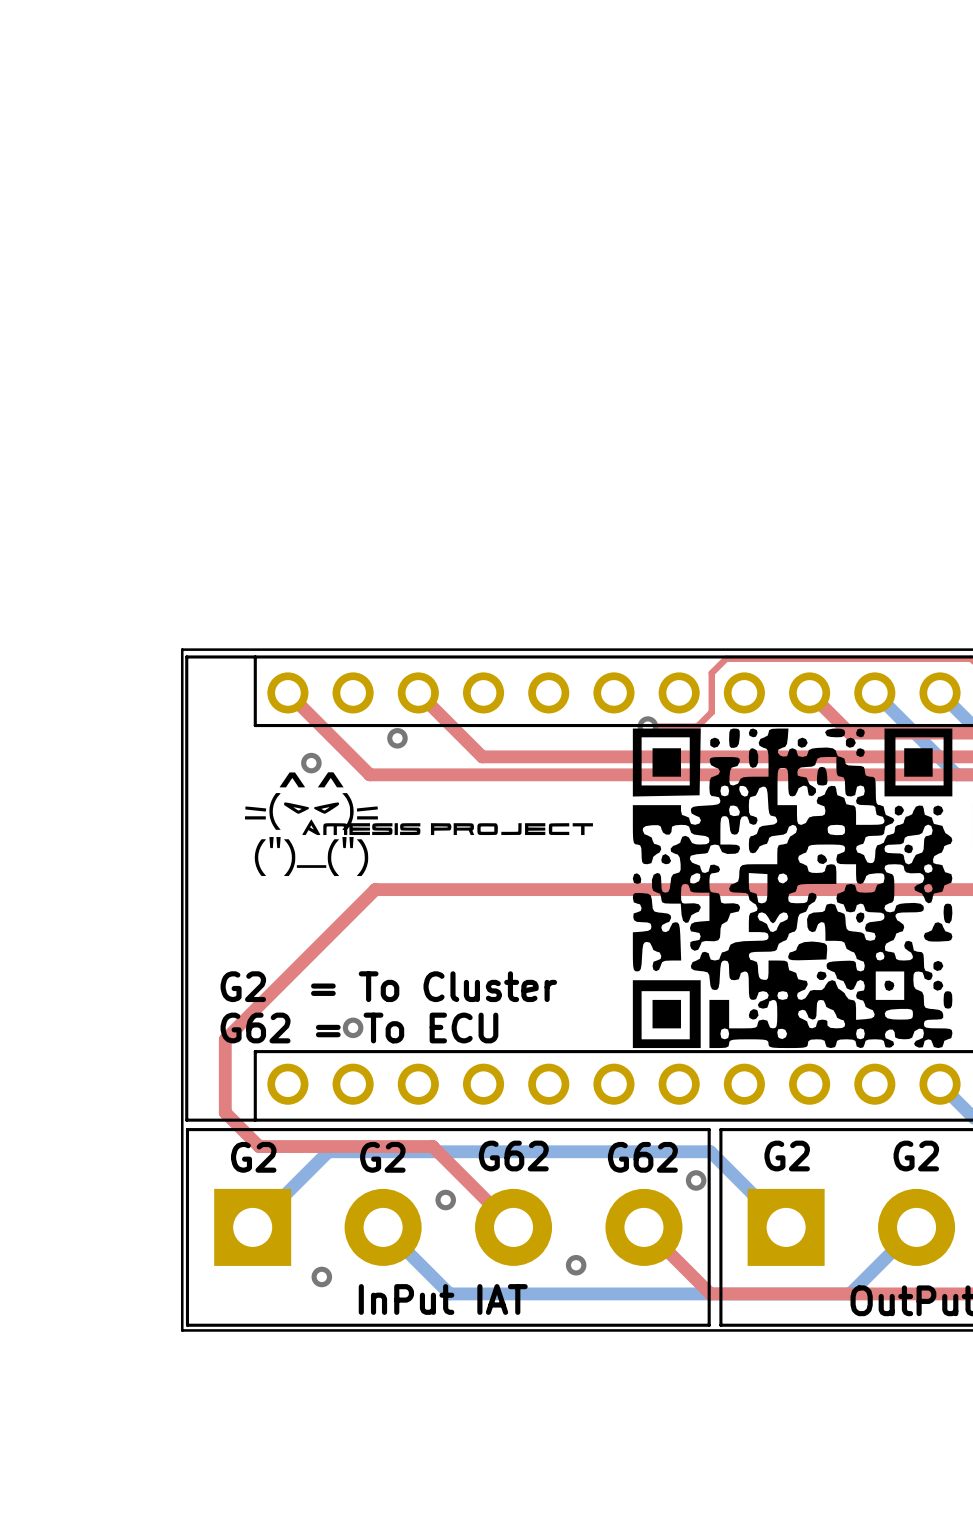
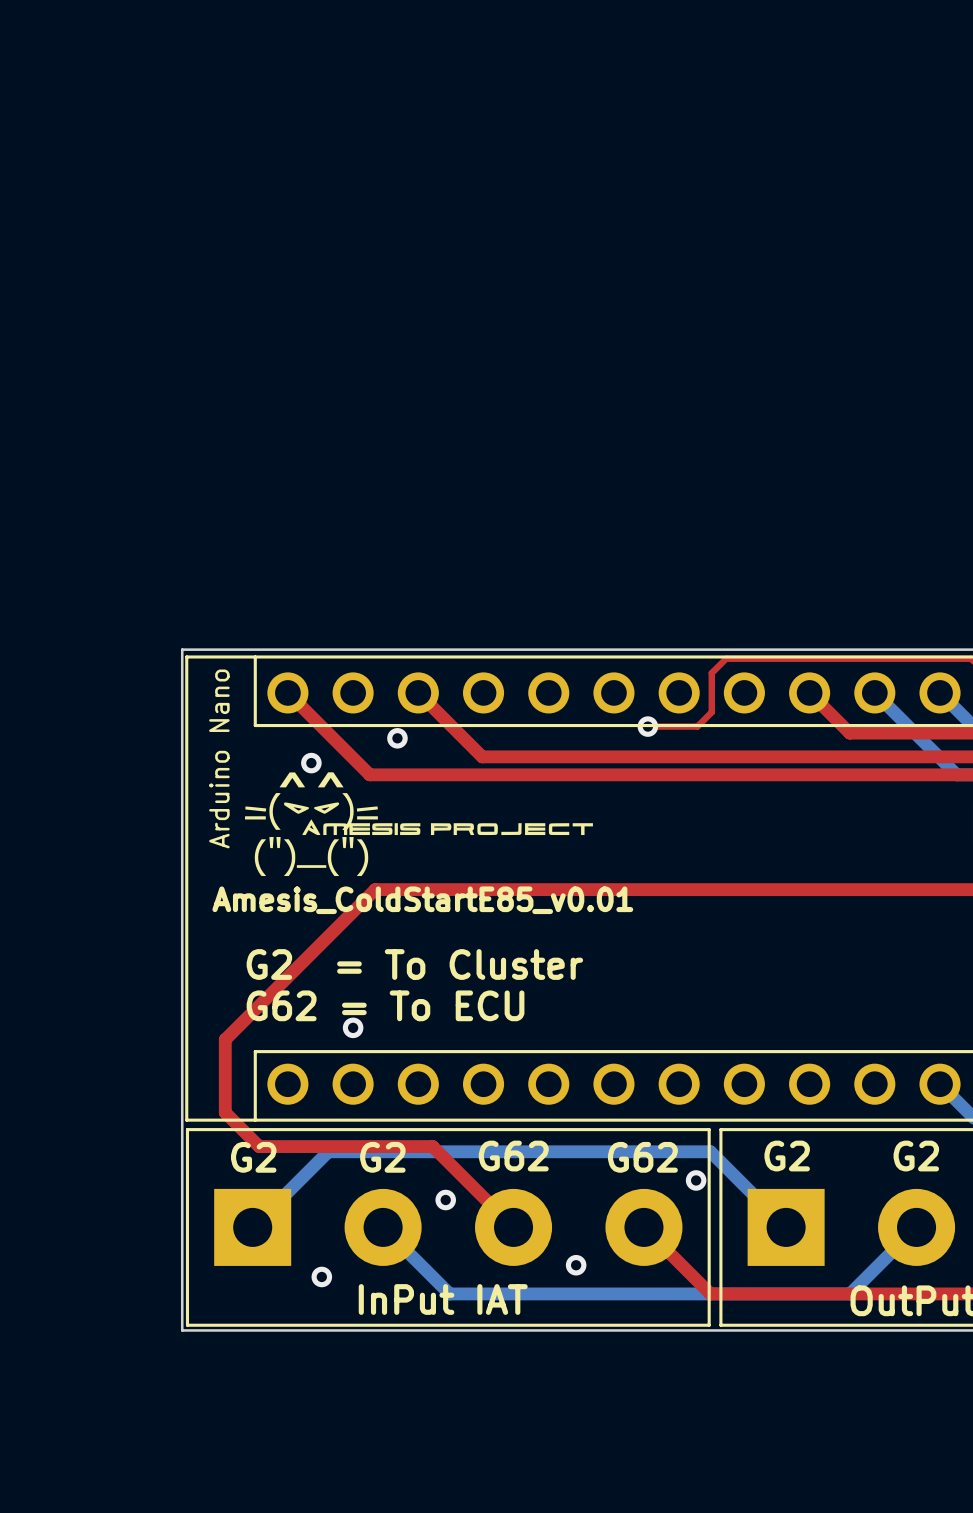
drawing: [632, 728, 953, 1049] -> none
text: none -> Arduino Nano (219, 758)
text: none -> Amesis_ColdStartE85_v0.01 (422, 900)
text position: G2 = To Cluster (388, 986) -> G2 = To Cluster (414, 964)
text position: G62 = To ECU (359, 1028) -> G62 = To ECU (385, 1005)

